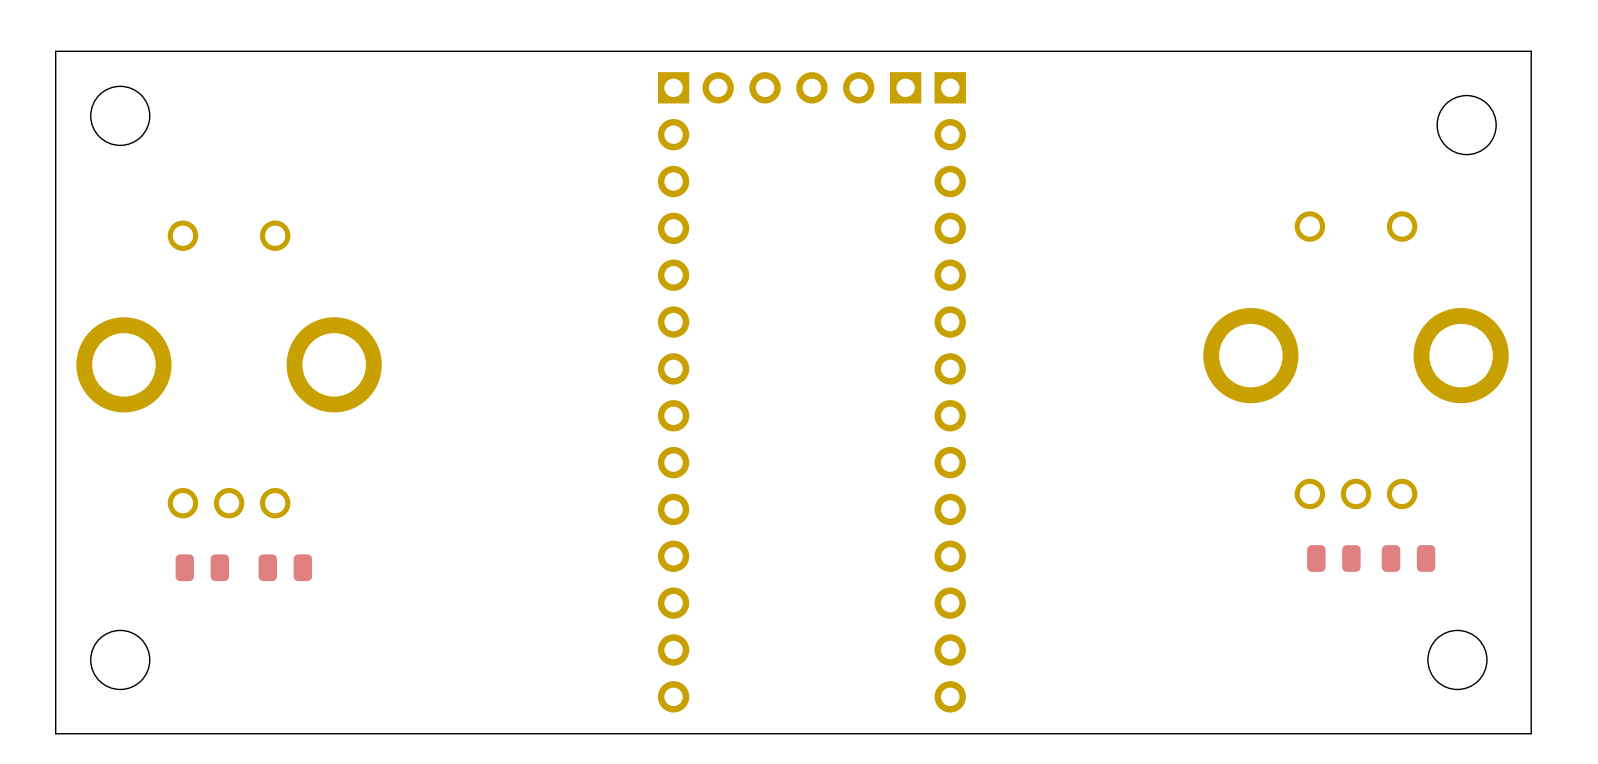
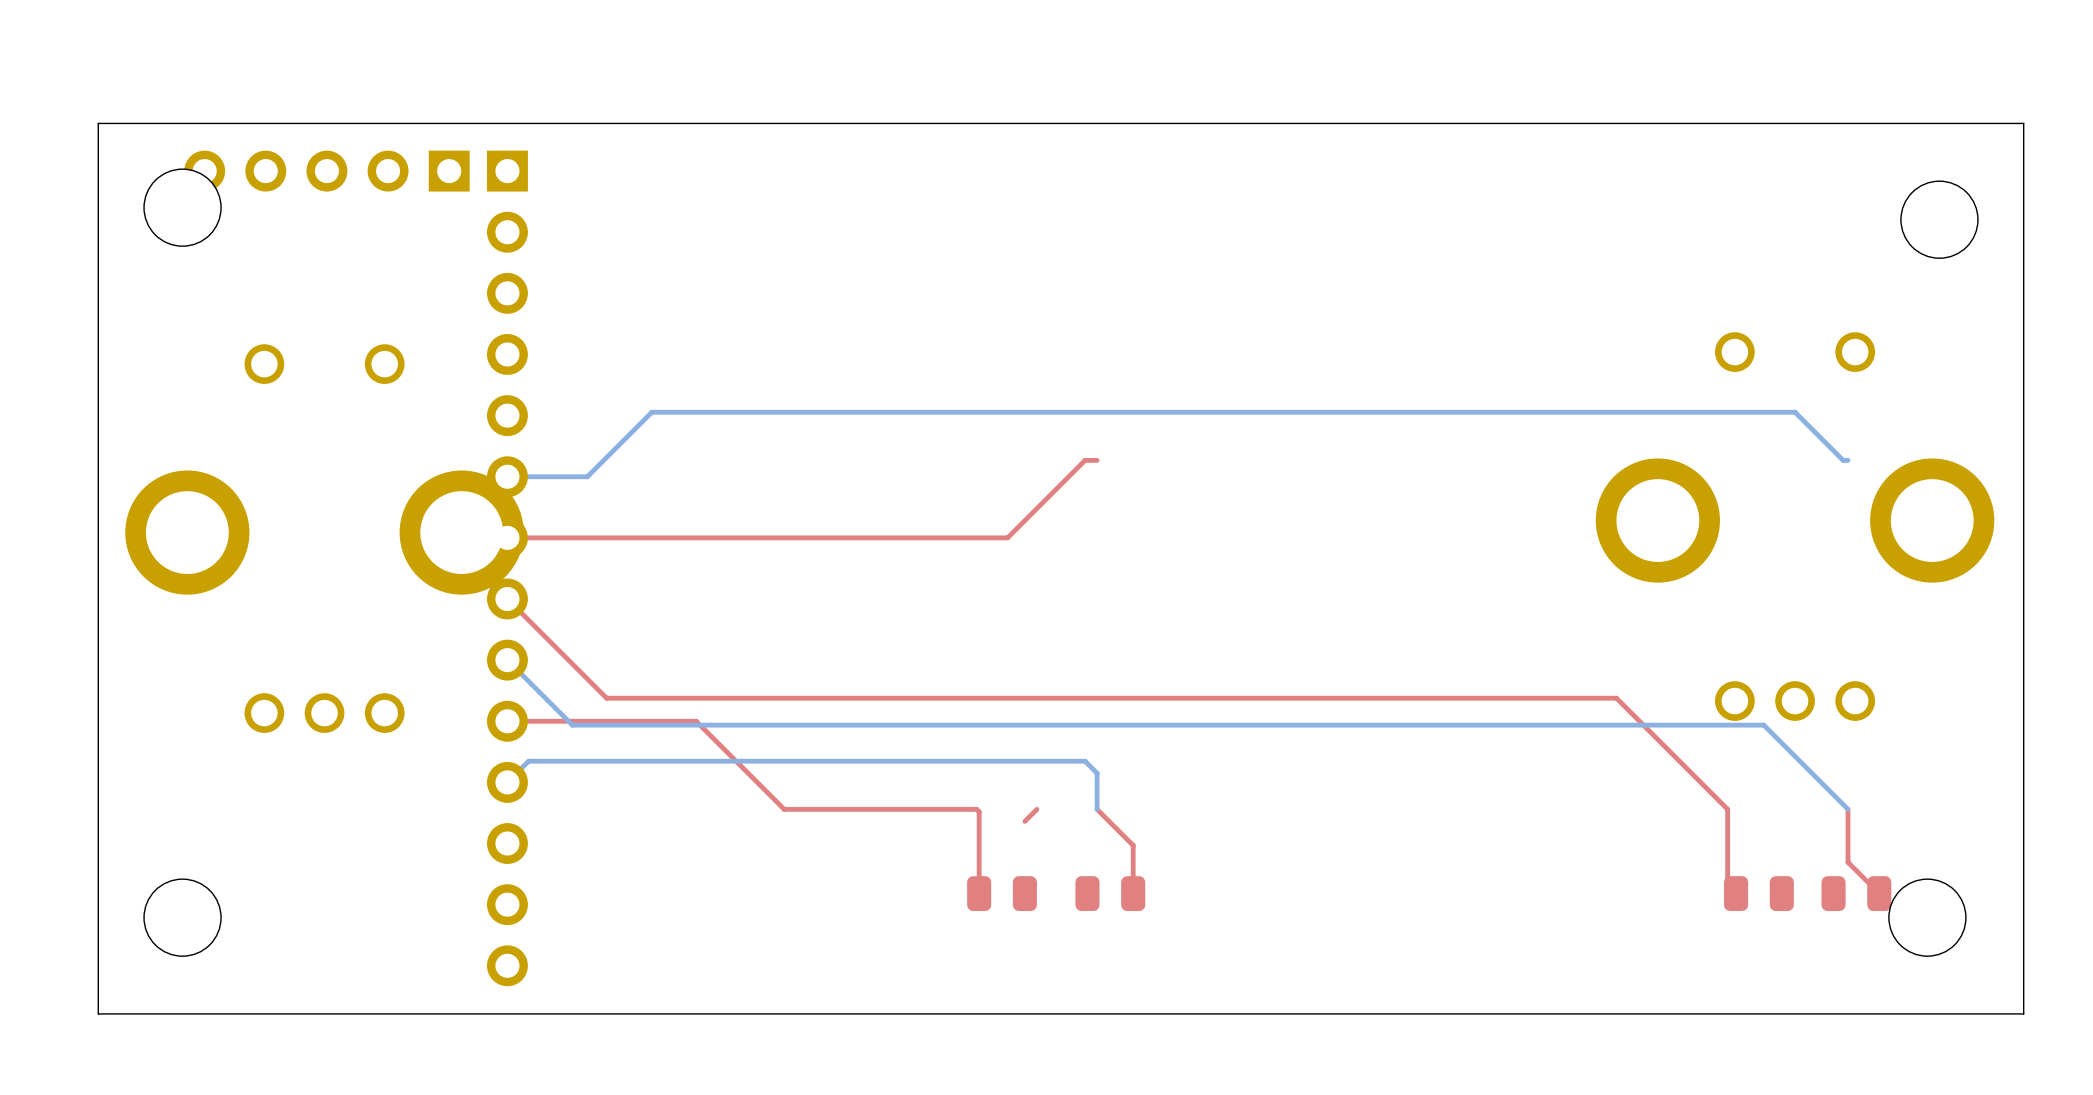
part: none -> (326, 171)
part: (811, 87) -> none
top track: none -> (1097, 460) (1085, 460) (1007, 537) (507, 537)
bottom track: none -> (1847, 460) (1843, 460) (1795, 412) (651, 412) (587, 476) (507, 476)
part: none -> (507, 568)
part: (673, 392) -> none
part: (950, 392) -> none
top track: none -> (507, 599) (606, 698) (1616, 698) (1727, 809) (1727, 885) (1736, 893)
bottom track: none -> (507, 660) (572, 725) (1763, 725) (1847, 809)
top track: none -> (507, 721) (696, 721) (784, 809) (976, 809) (979, 811) (979, 893)
bottom track: none -> (507, 782) (528, 761) (1085, 761) (1097, 773) (1097, 809)
part: (1333, 558) -> none
part: (1408, 558) -> none
part: (202, 567) -> none
part: (285, 567) -> none
top track: none -> (1036, 809) (1024, 821)
top track: none -> (1097, 809) (1133, 845) (1133, 893)
top track: none -> (1847, 809) (1847, 862) (1879, 893)
part: none -> (1002, 893)
part: none -> (1110, 893)
part: none -> (1758, 893)
part: none -> (1856, 893)

